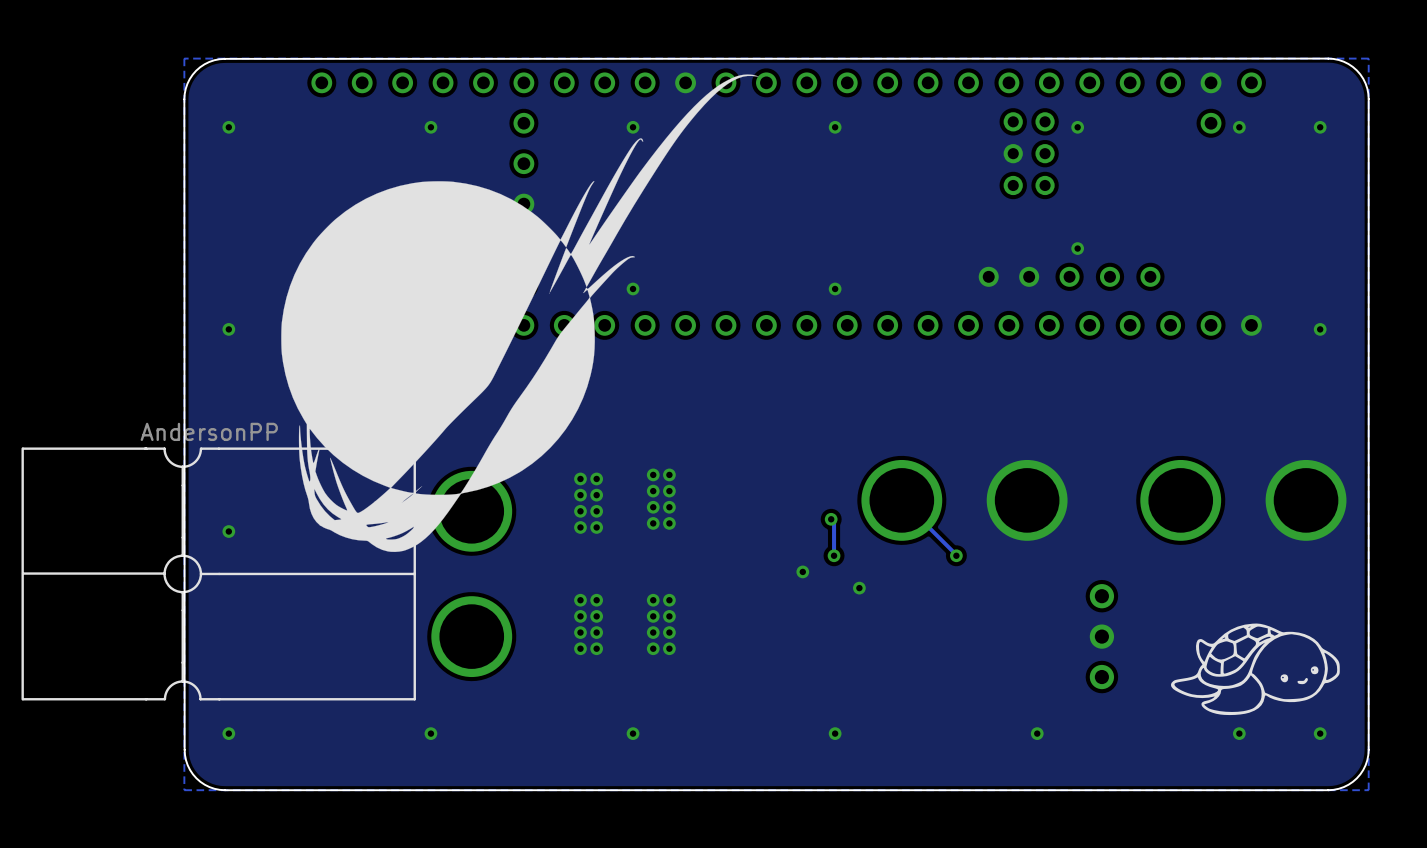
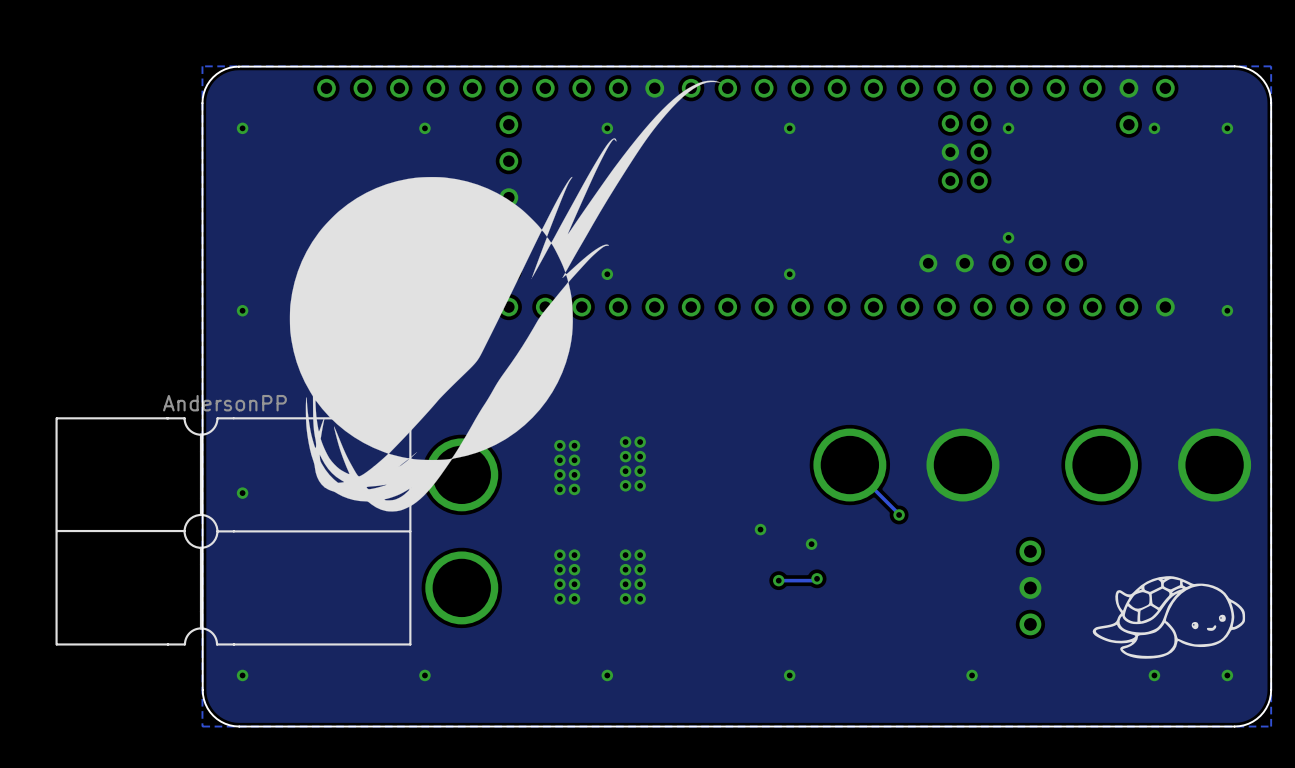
track: (831, 519) (834, 522) (834, 555) -> none
via: (831, 519) -> none
via: (834, 555) -> none
track: none -> (817, 578) (815, 580) (778, 580)
via: none -> (817, 578)
via: none -> (778, 580)

